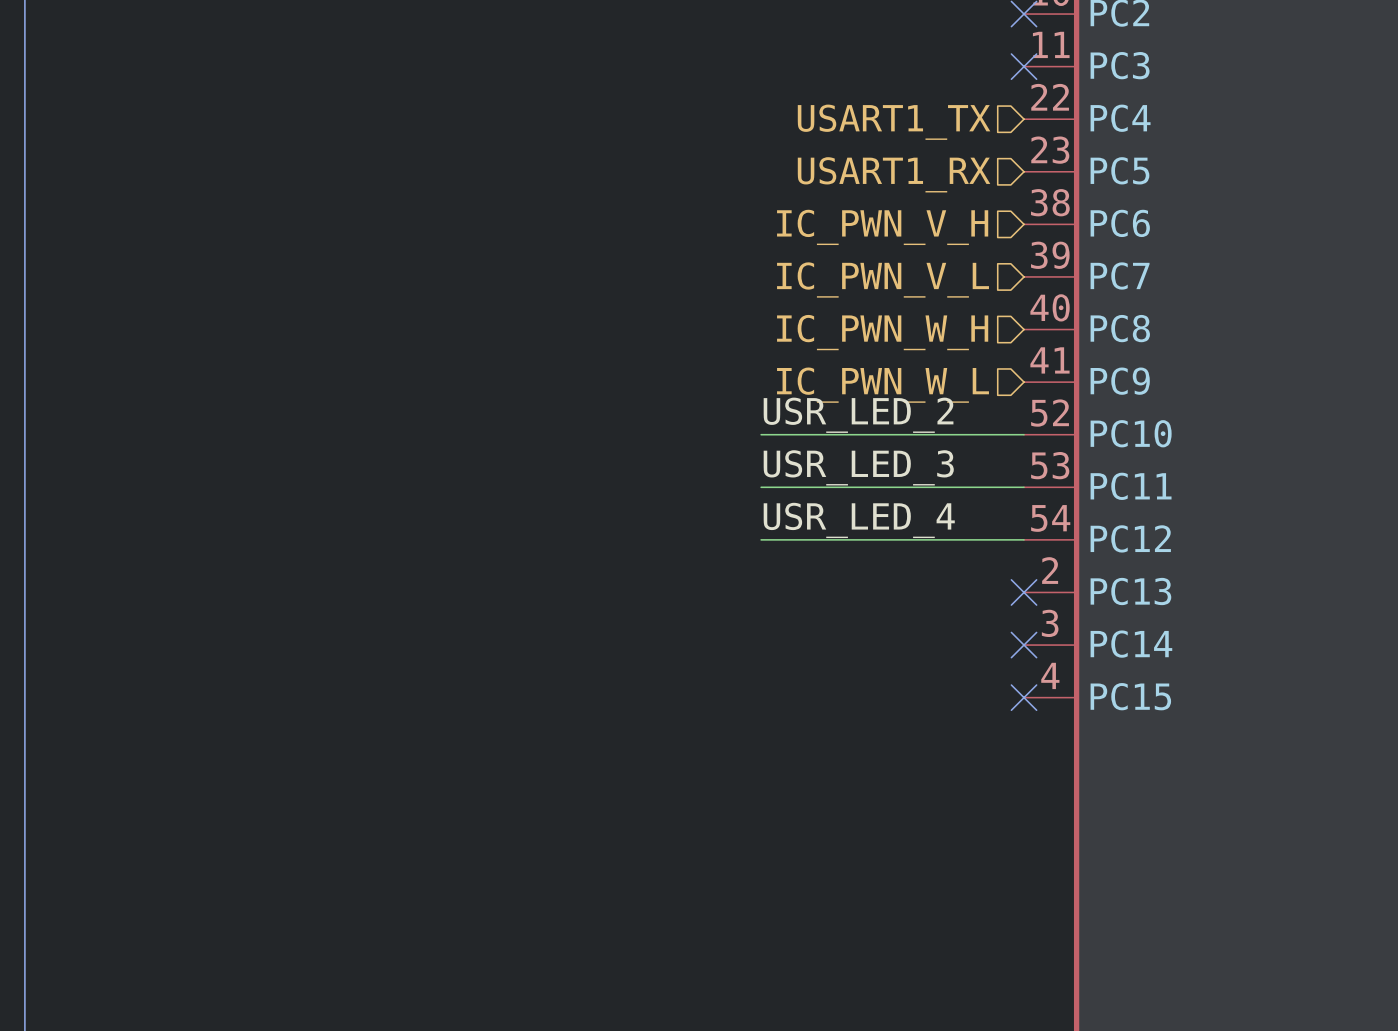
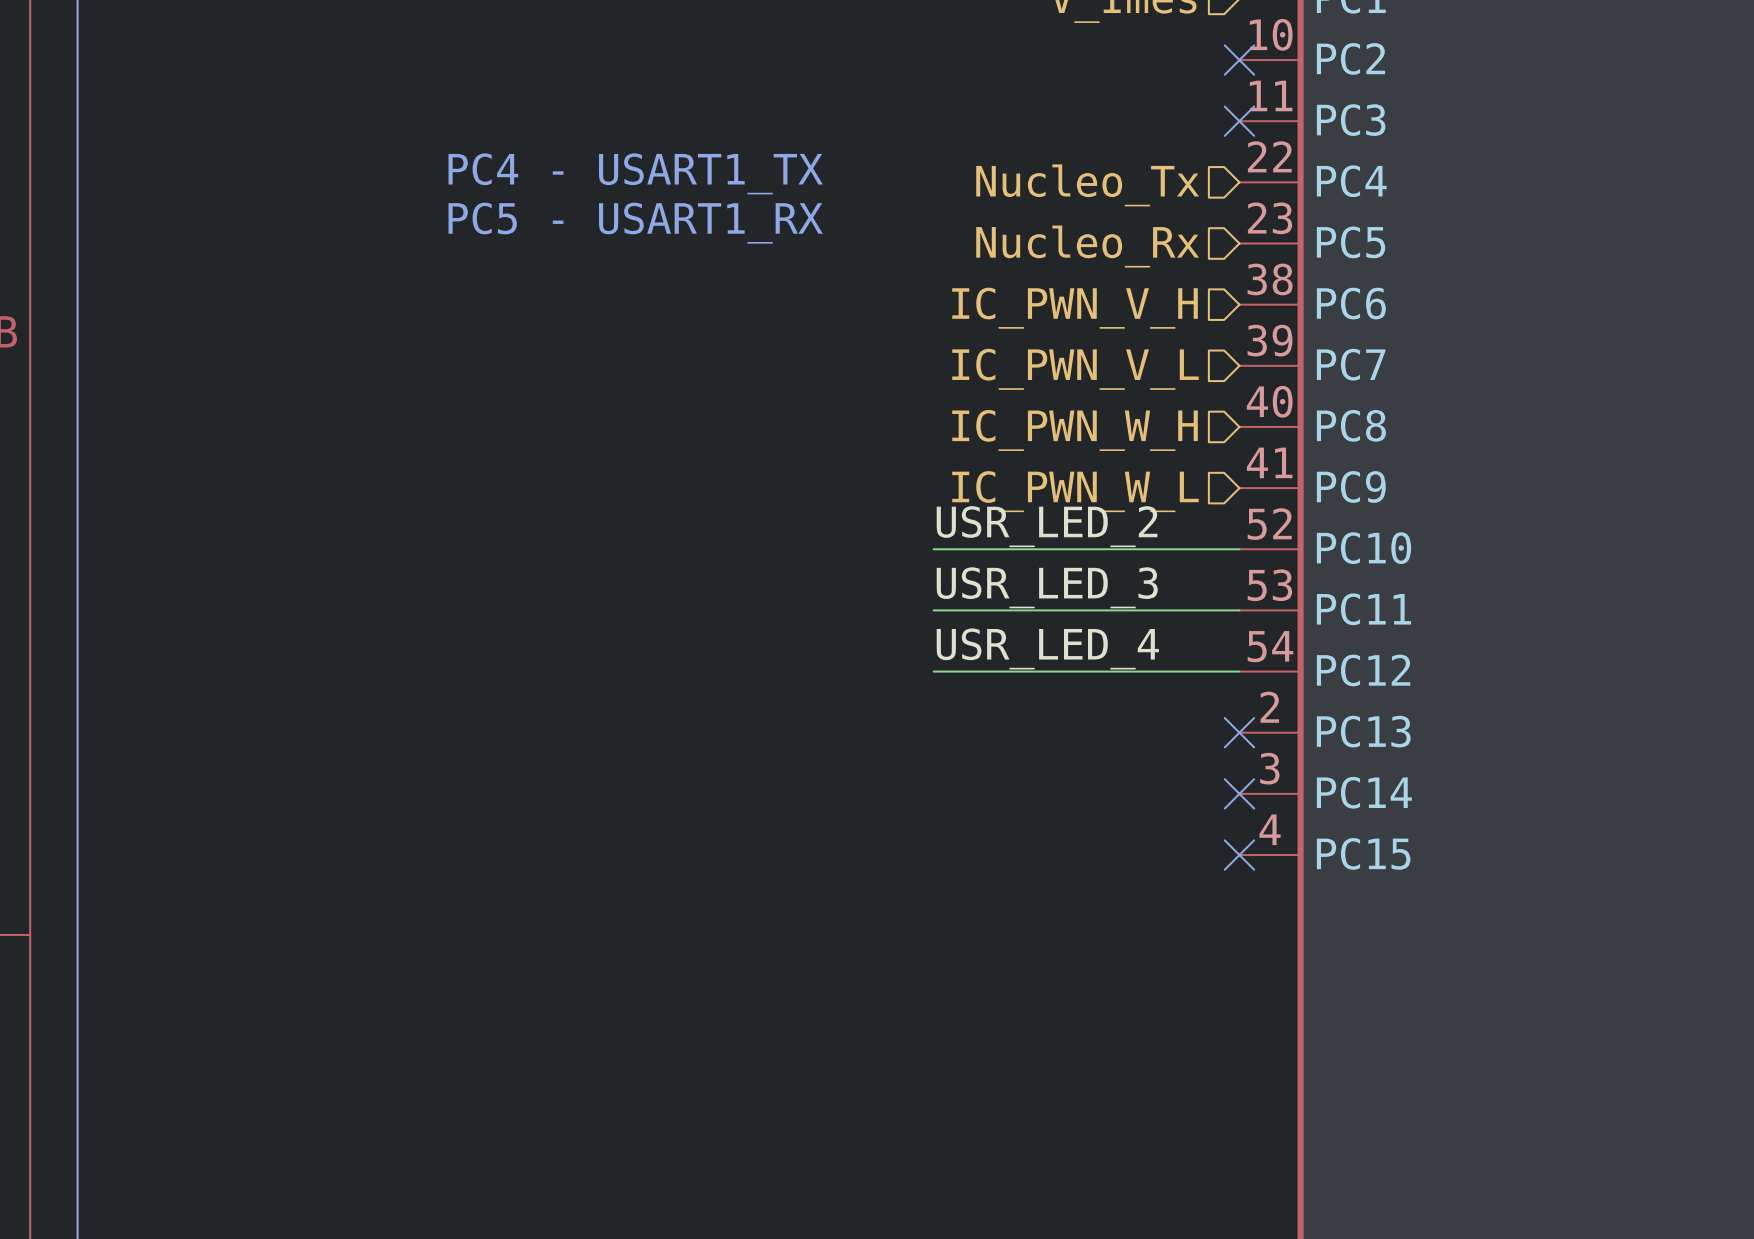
text: none -> PC4 - USART1_TX (635, 173)
hierarchical label: USART1_TX (894, 122) -> Nucleo_Tx (1087, 185)
text: none -> PC5 - USART1_RX (635, 223)
hierarchical label: USART1_RX (894, 174) -> Nucleo_Rx (1087, 246)

